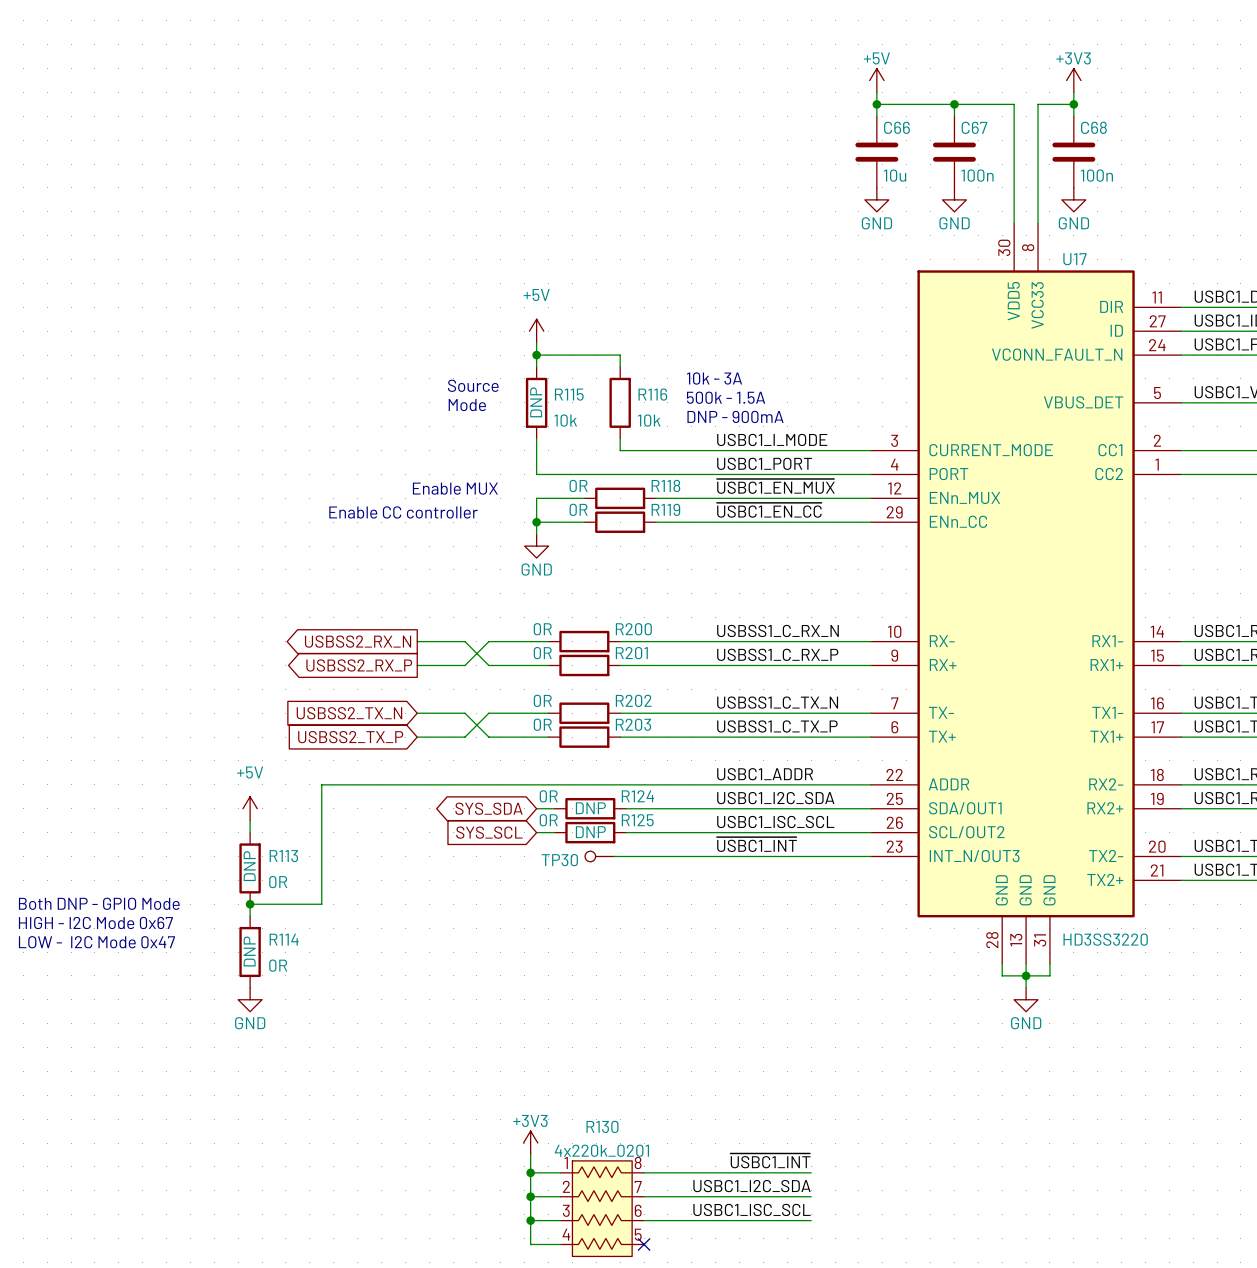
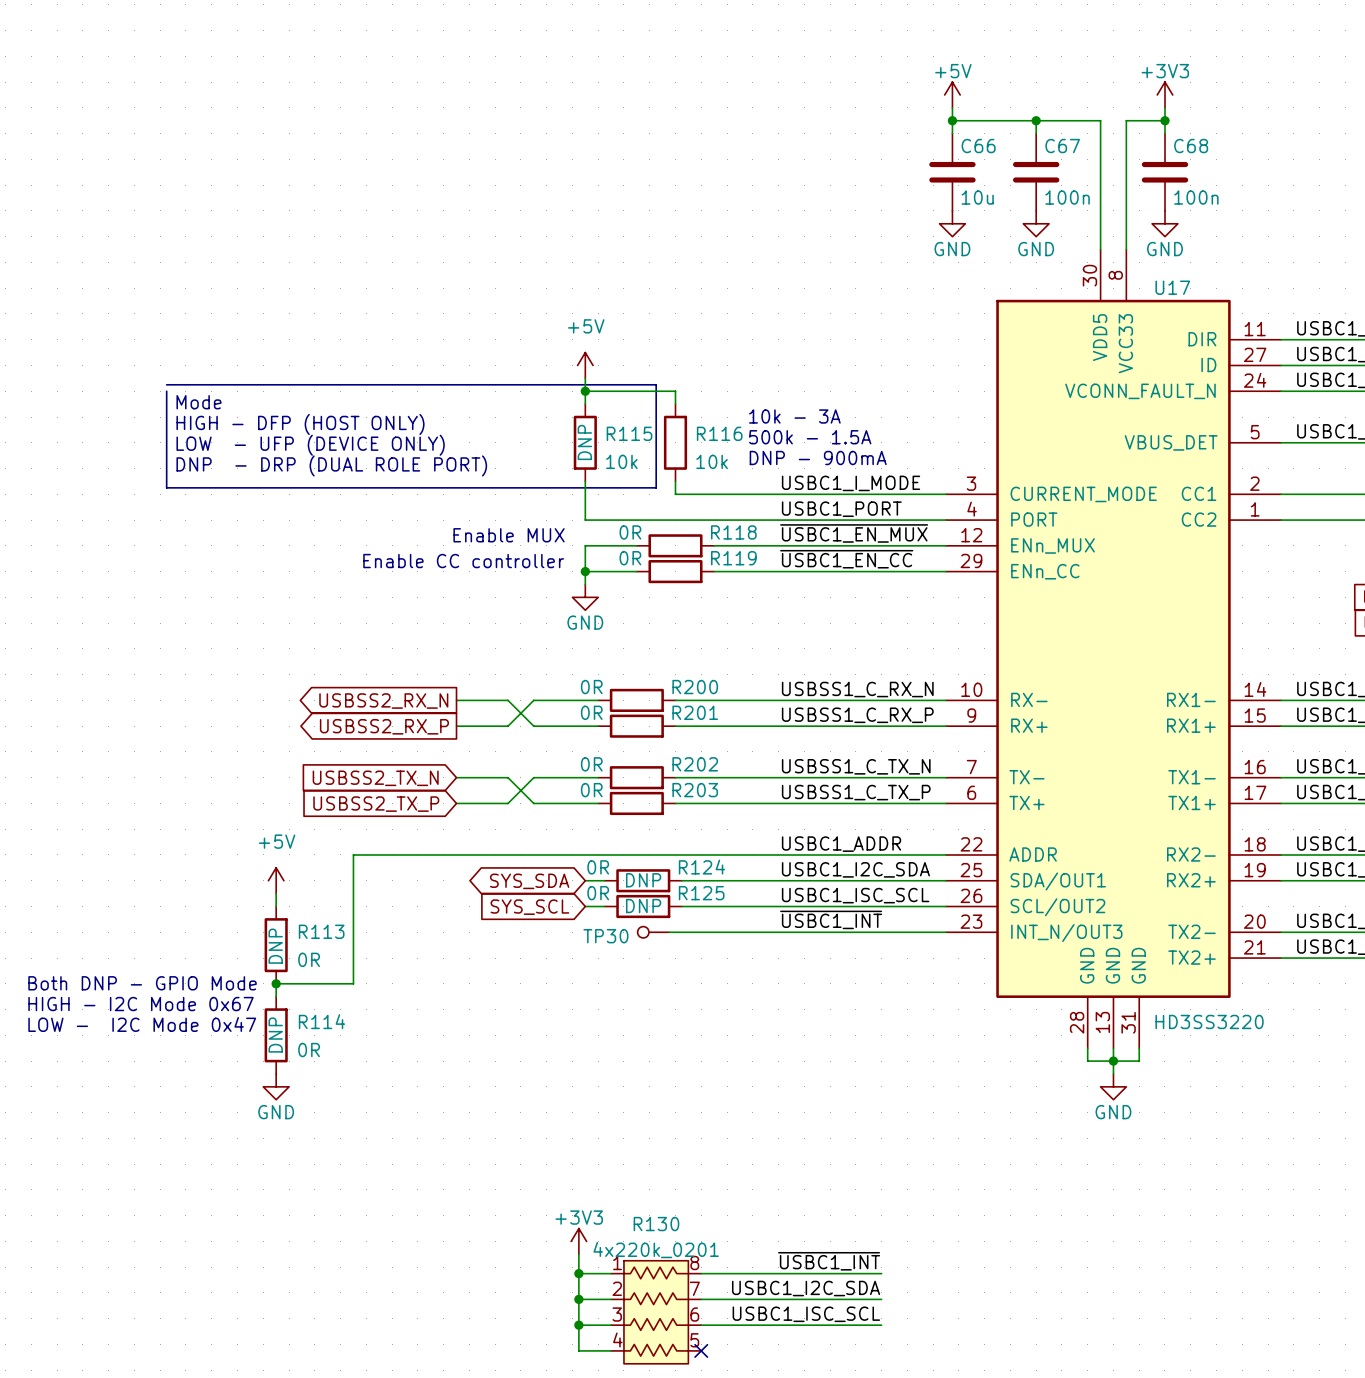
line: none -> (166, 384) (656, 384) (656, 487) (166, 487) (166, 391)
text: none -> Mode (198, 402)
text: none -> HIGH - DFP (HOST ONLY) (300, 424)
text: Source (473, 385) -> none
text: none -> LOW - UFP (DEVICE ONLY) (310, 445)
text: Mode (467, 405) -> none
text: none -> DNP - DRP (DUAL ROLE PORT) (331, 465)

